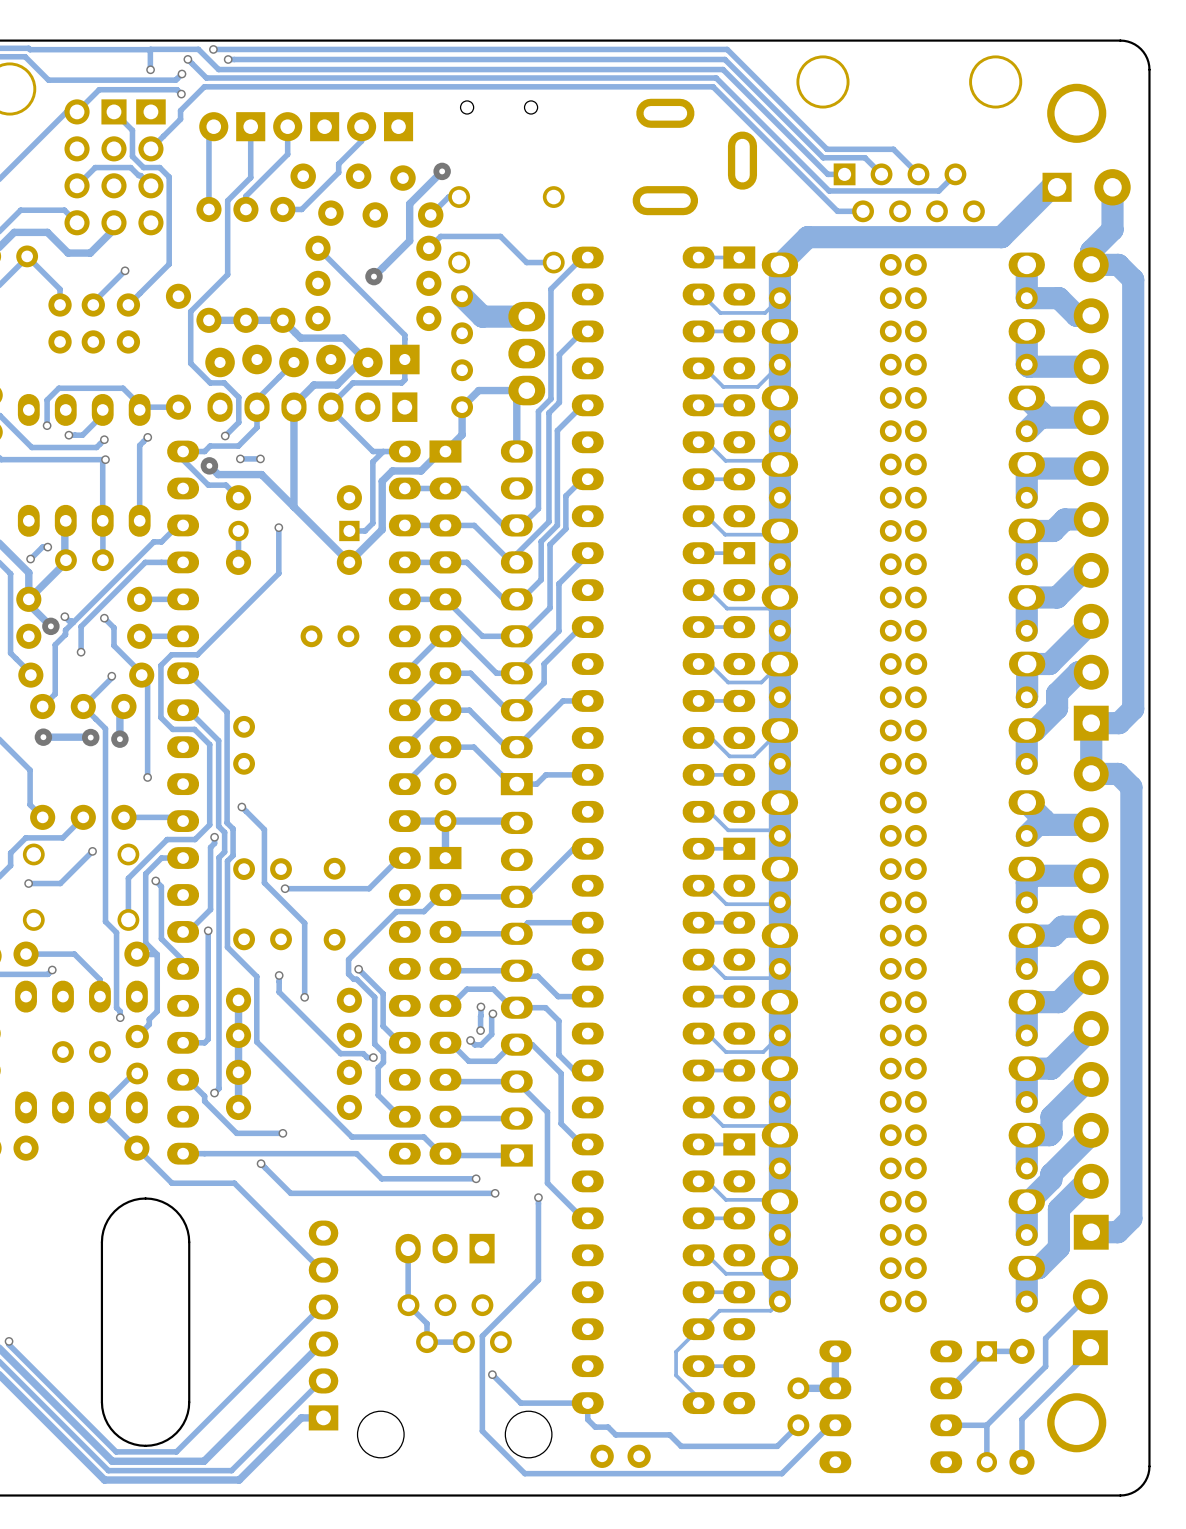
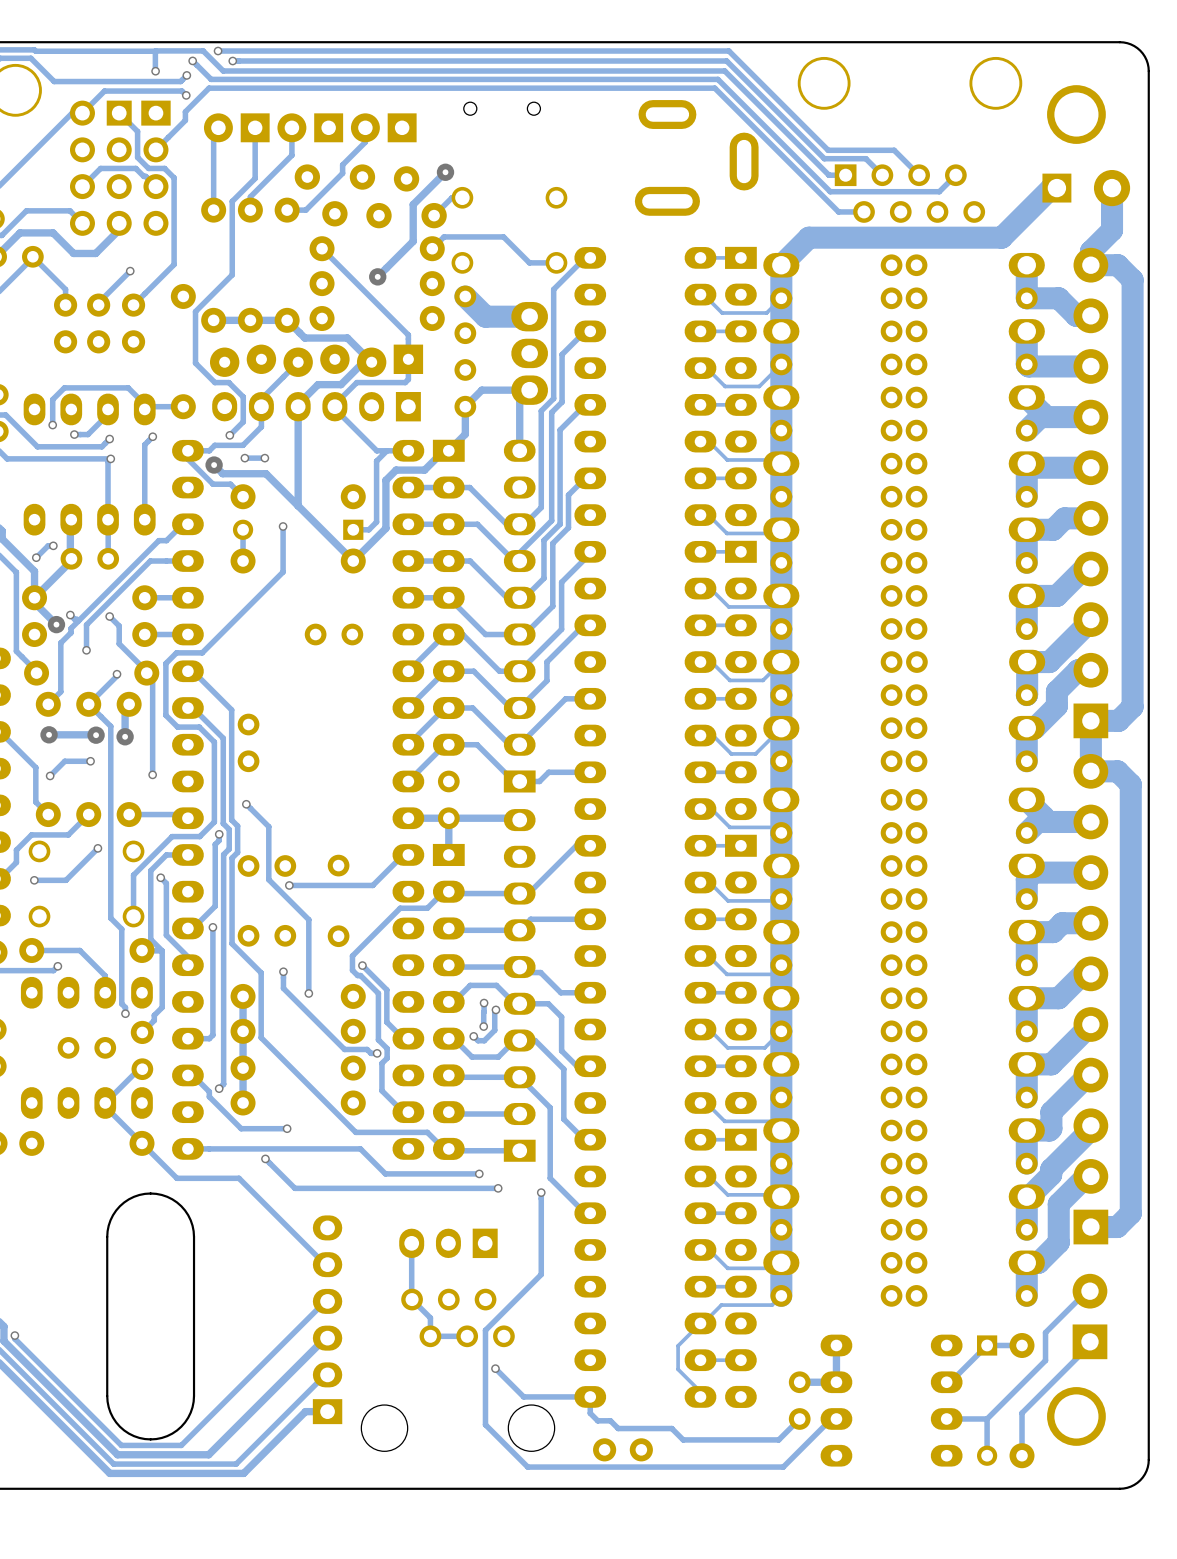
track: none -> (90, 761) (64, 761) (50, 775)
via: none -> (90, 761)
via: none -> (50, 775)

